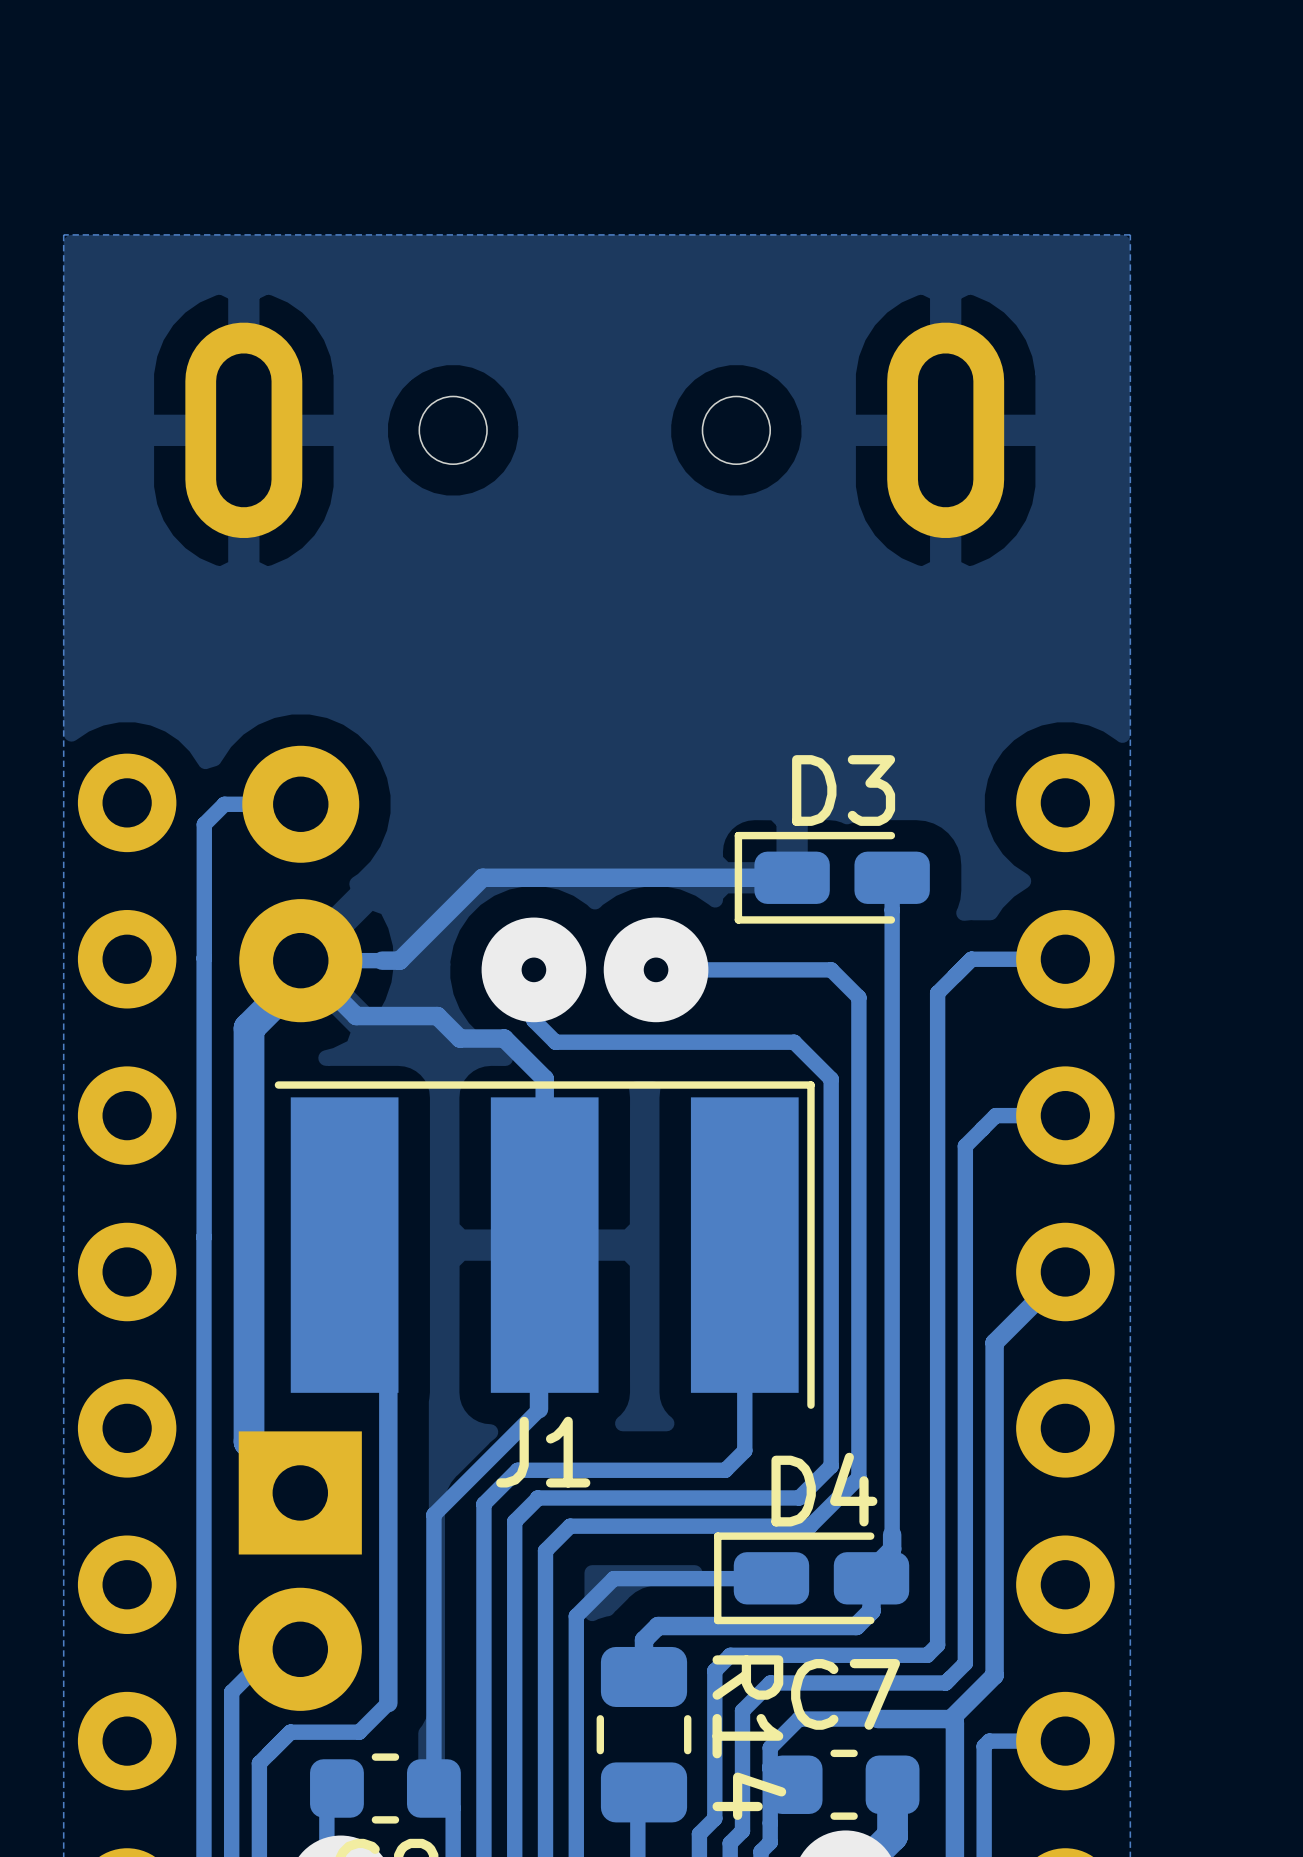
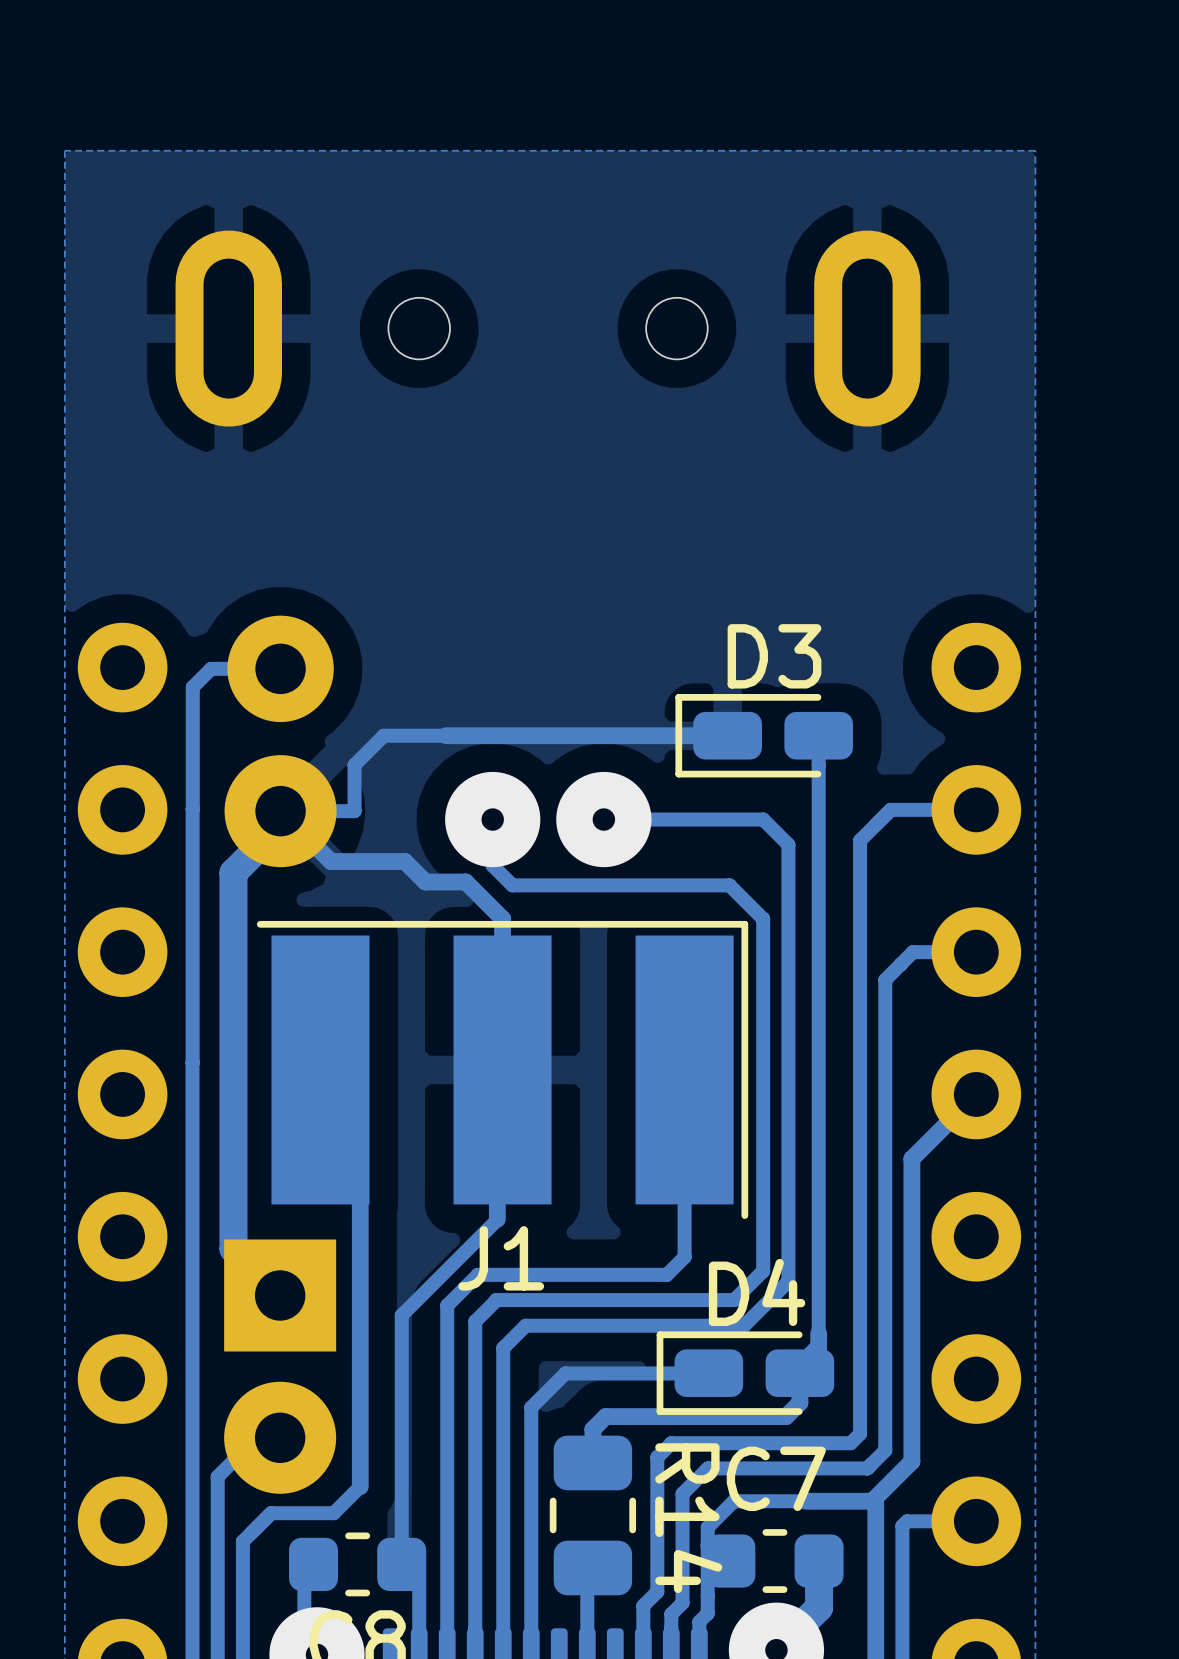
track: (482, 877) (399, 960) (382, 960) -> (446, 735) (383, 735) (354, 765) (354, 811)

